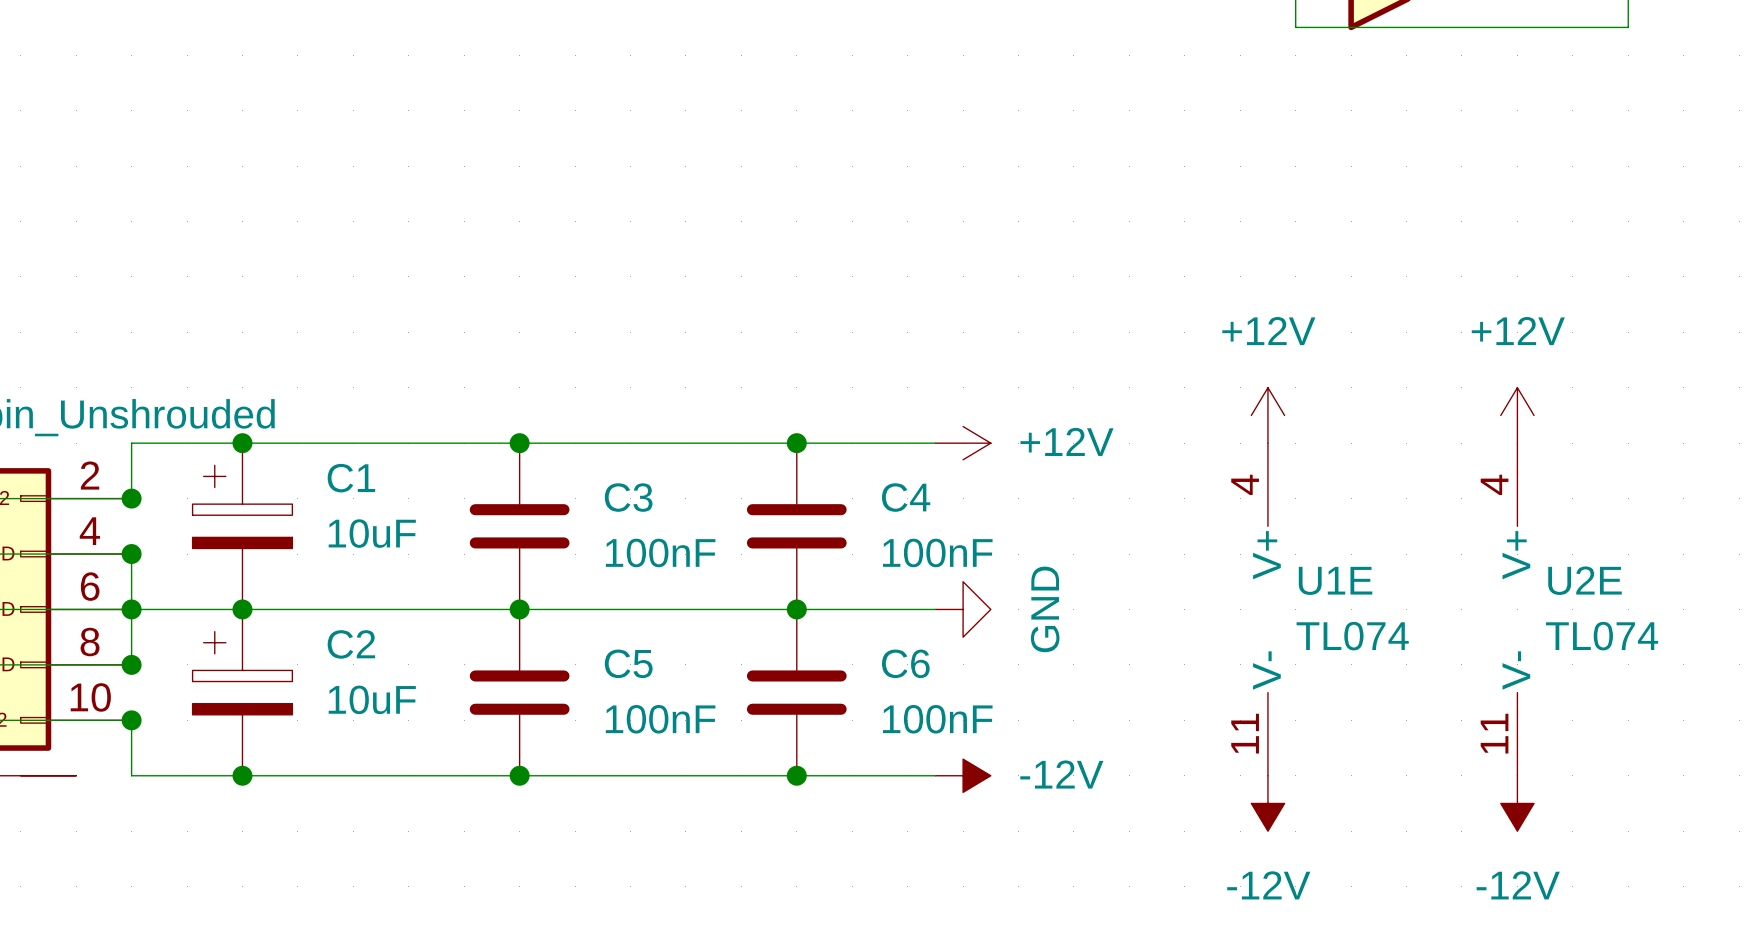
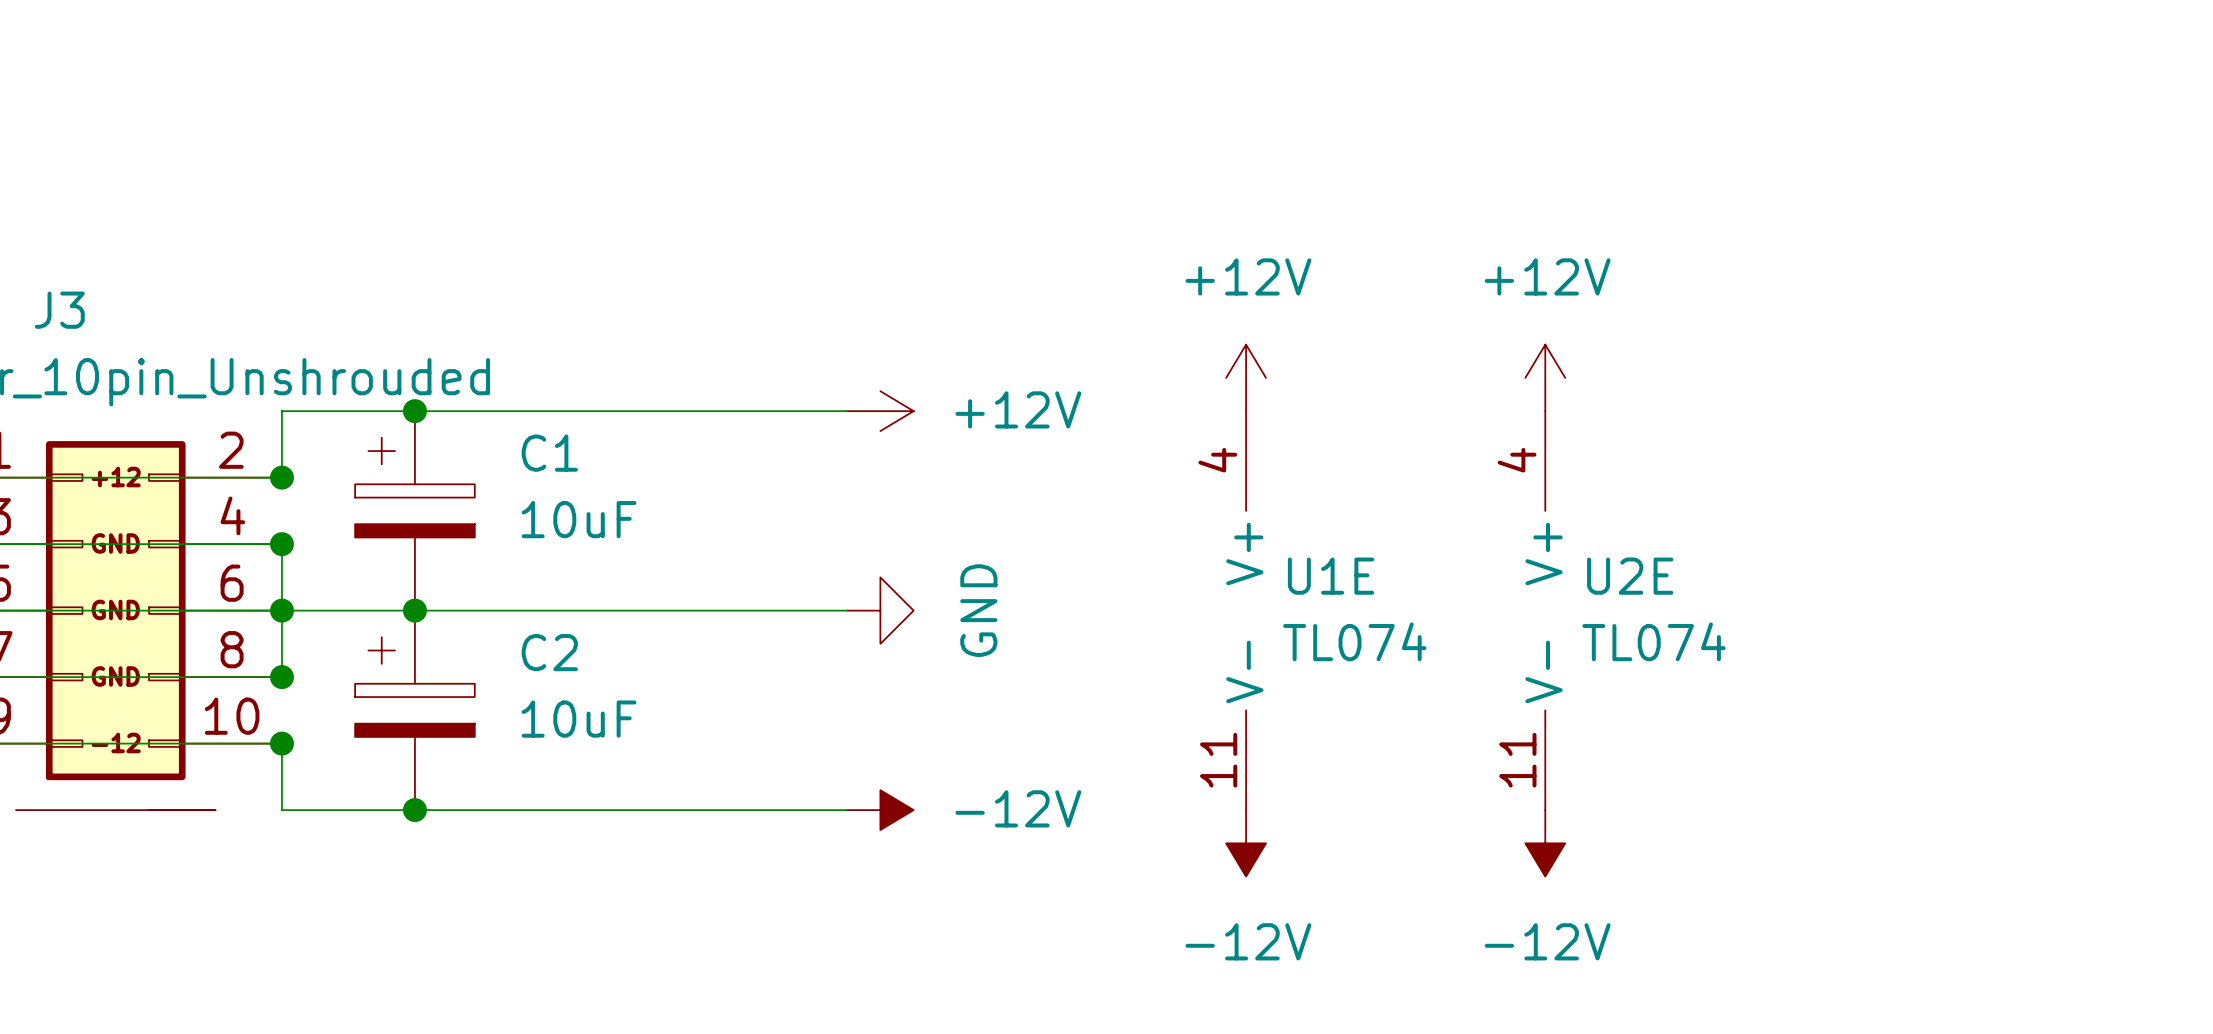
power symbol position: +12V (1267, 415) -> +12V (1545, 377)
power symbol: +12V (1517, 415) -> none
junction: (519, 443) -> none
wire: (602, 443) (935, 443) -> none
power symbol: none -> +12V (880, 411)
junction: (796, 443) -> none
power symbol rotation: 0° (963, 443) -> 90° counterclockwise (1246, 377)
power symbol position: +12V (963, 443) -> +12V (1246, 377)
C3: 100nF (519, 526) -> none
C4: 100nF (796, 526) -> none
junction: (519, 609) -> none
wire: (602, 609) (935, 609) -> none
junction: (796, 609) -> none
power symbol position: GND (963, 609) -> GND (880, 610)
U1E position: (1267, 609) -> (1246, 610)
U2E position: (1517, 609) -> (1545, 610)
C5: 100nF (519, 692) -> none
C6: 100nF (796, 692) -> none
junction: (519, 775) -> none
wire: (602, 775) (935, 775) -> none
power symbol: none -> -12V (880, 810)
junction: (796, 775) -> none
power symbol rotation: 0° (963, 775) -> 90° clockwise (1246, 843)
power symbol position: -12V (963, 775) -> -12V (1246, 843)
power symbol position: -12V (1267, 803) -> -12V (1545, 843)
power symbol: -12V (1517, 803) -> none

